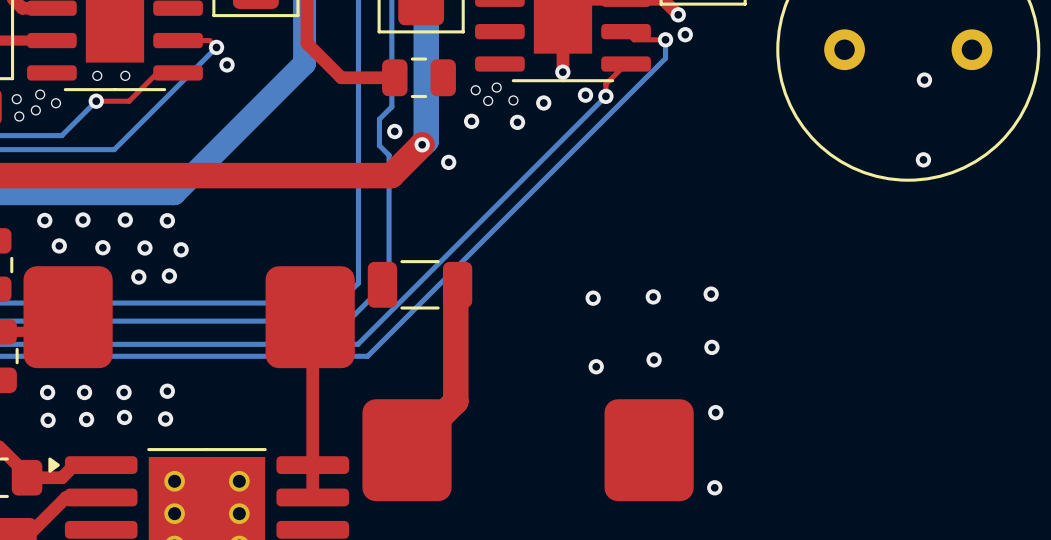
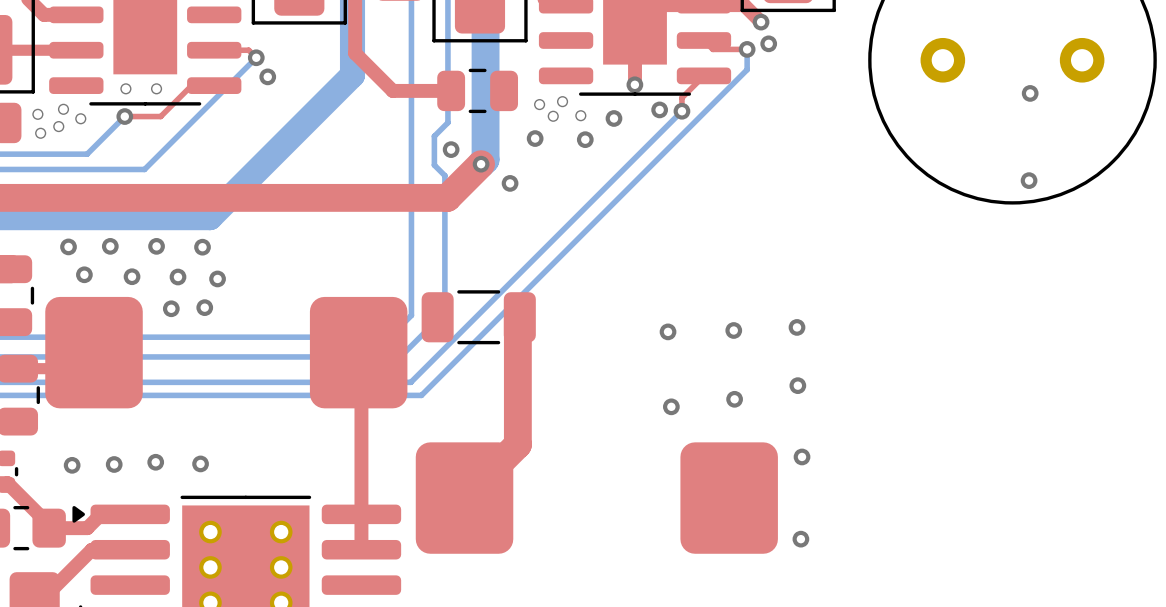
via: (167, 391) -> none
via: (47, 392) -> none
via: (84, 392) -> none
via: (124, 392) -> none

